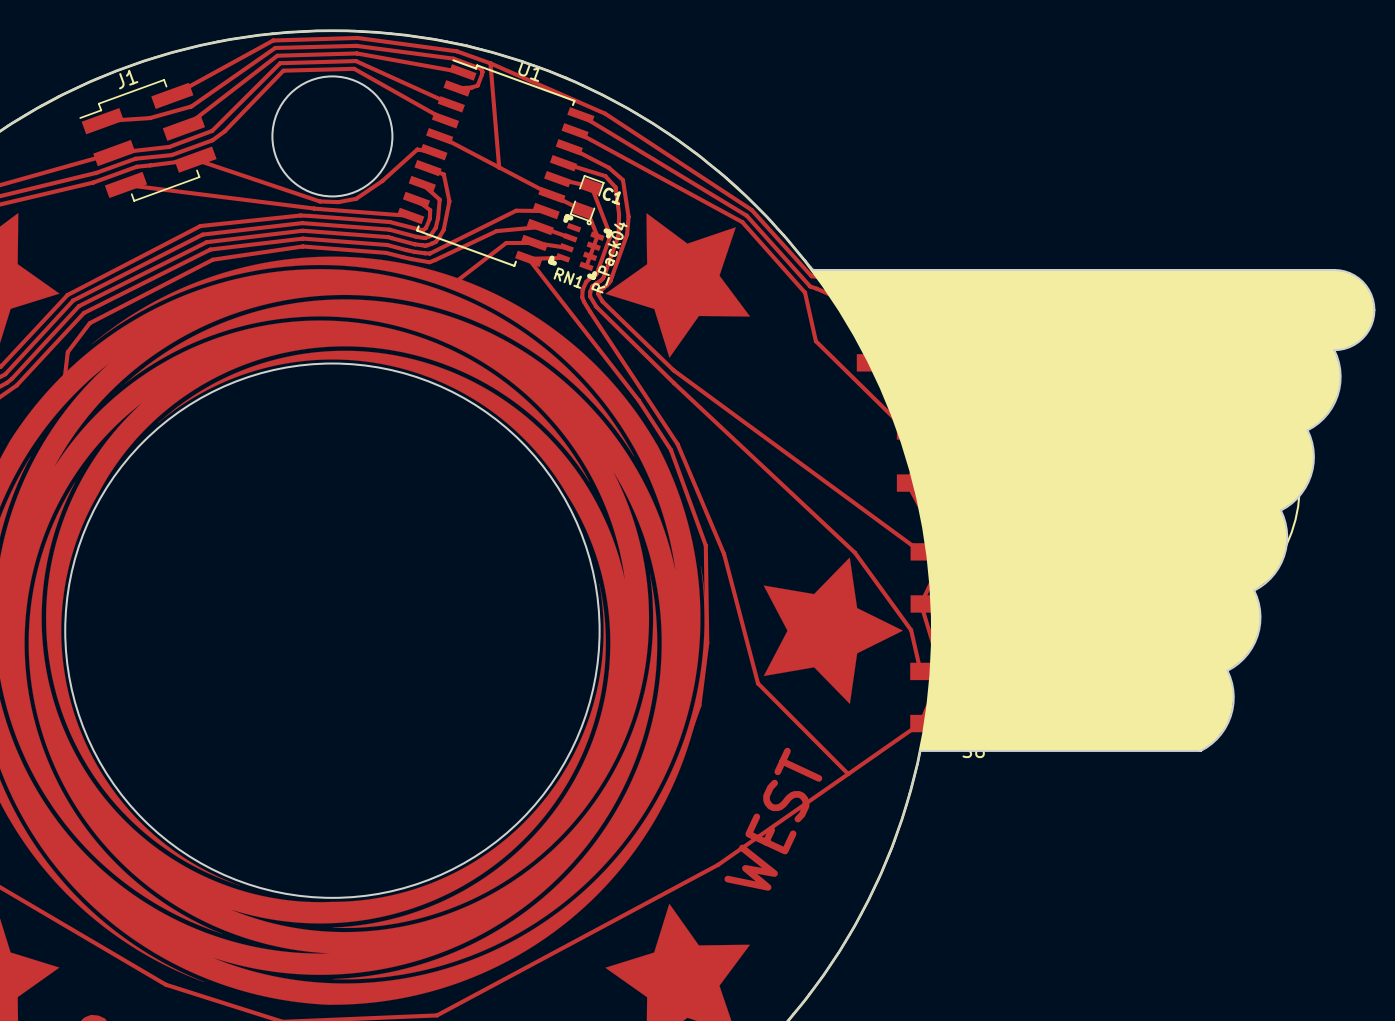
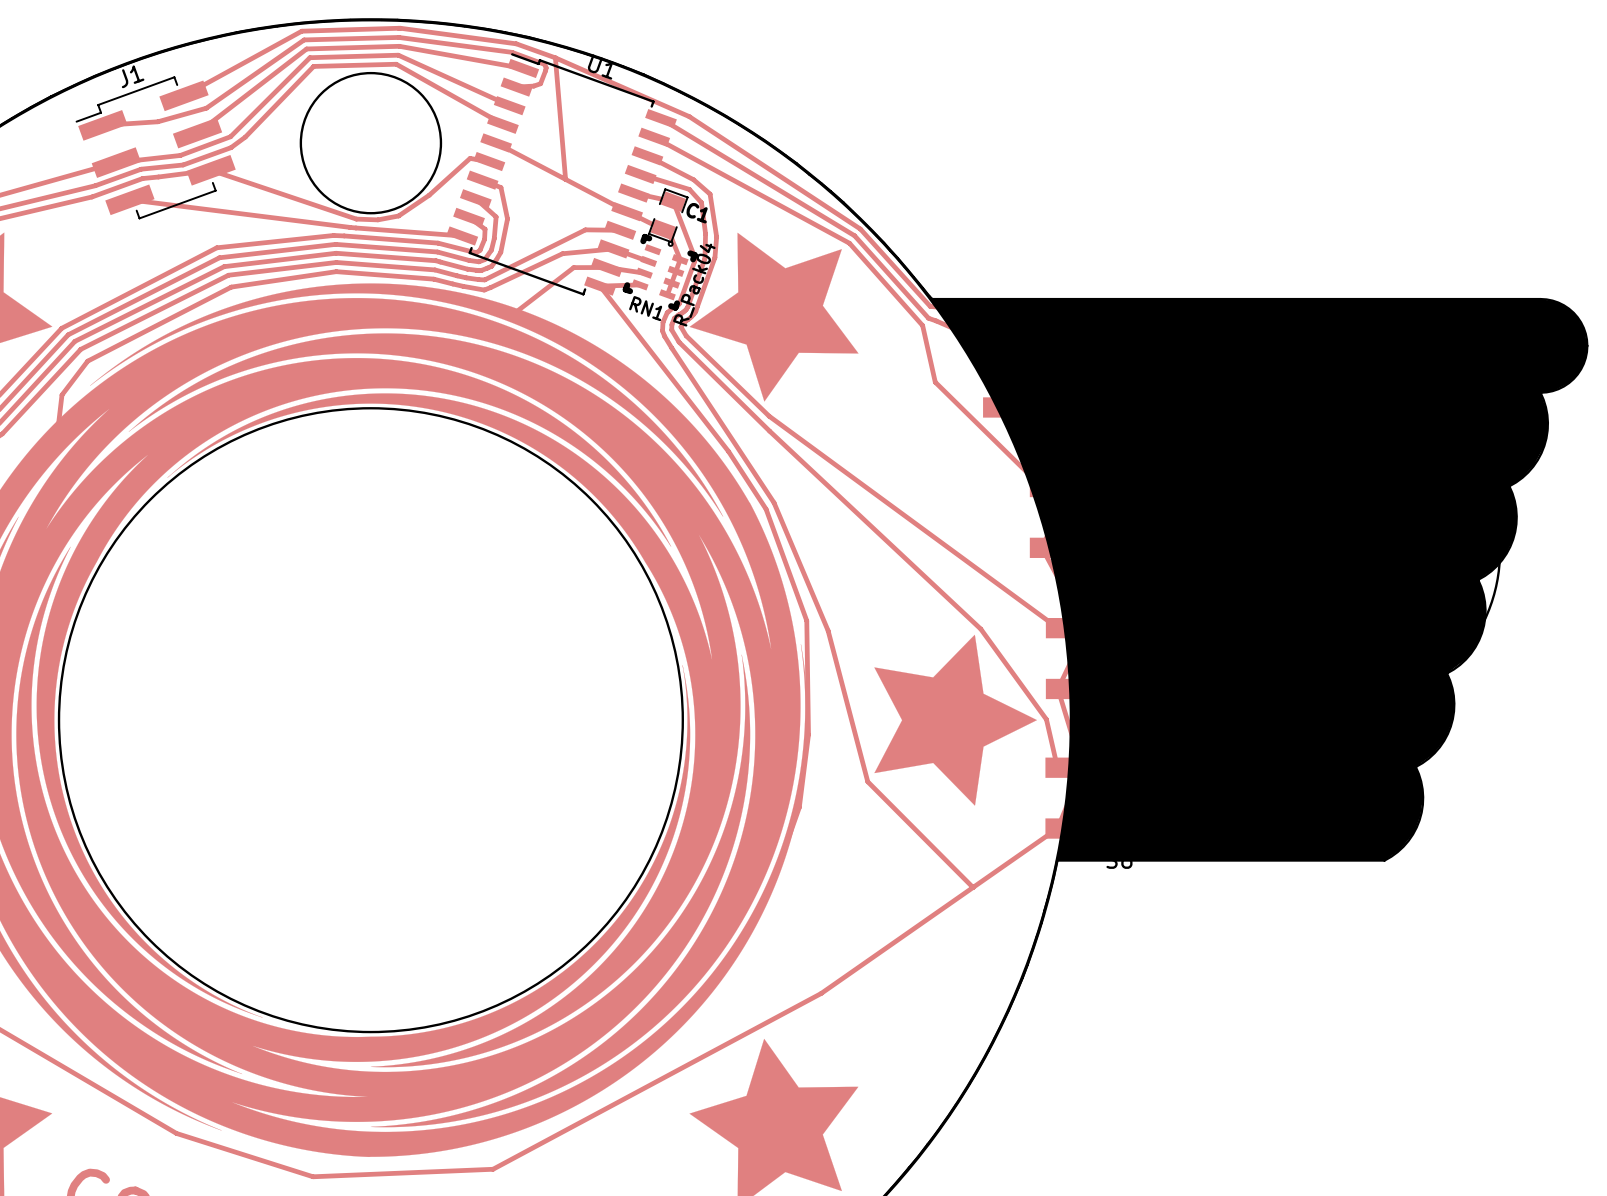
text: WEST (773, 819) -> none

